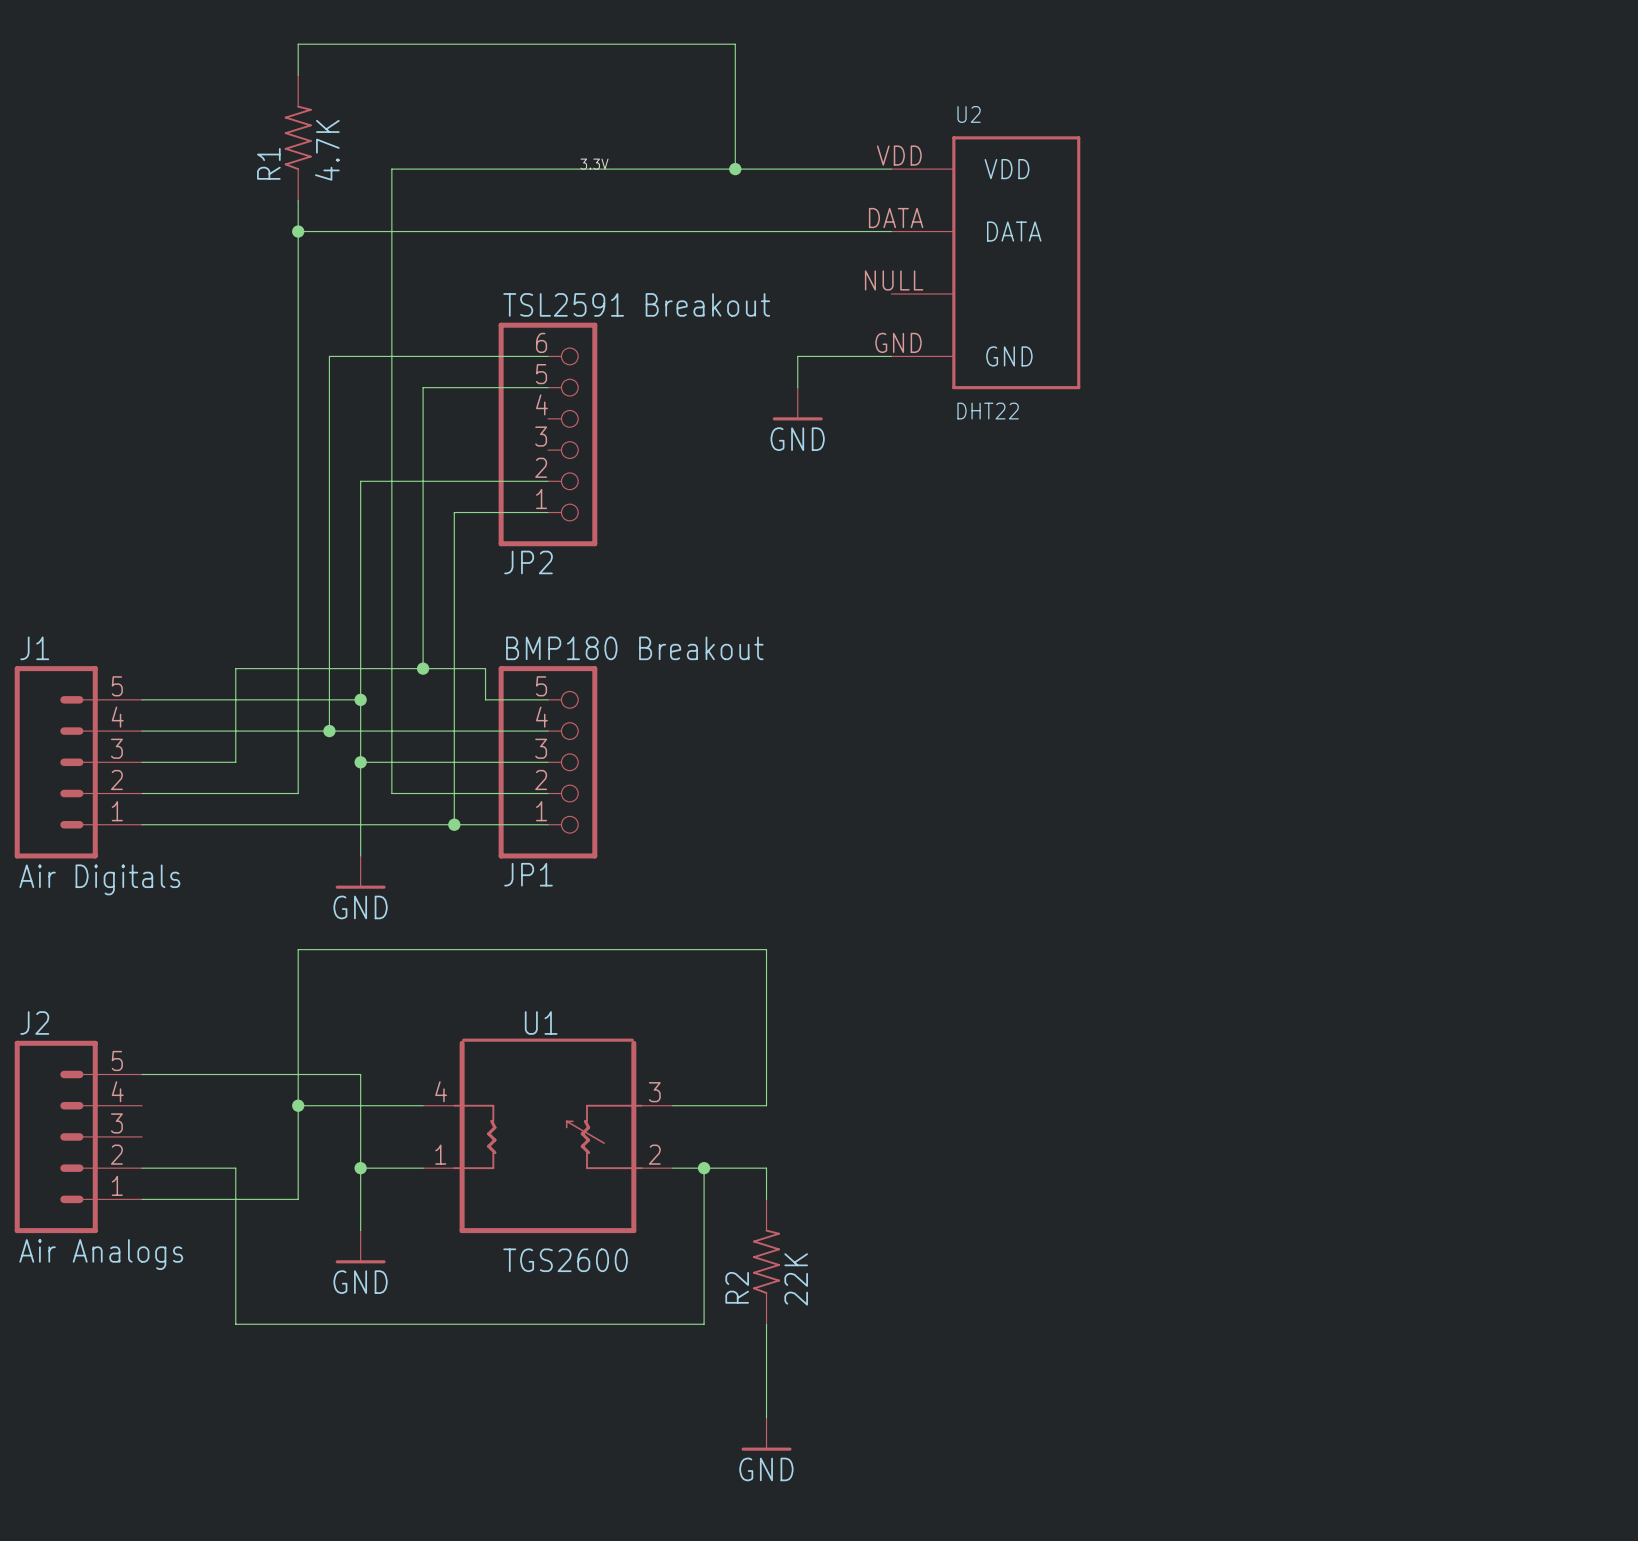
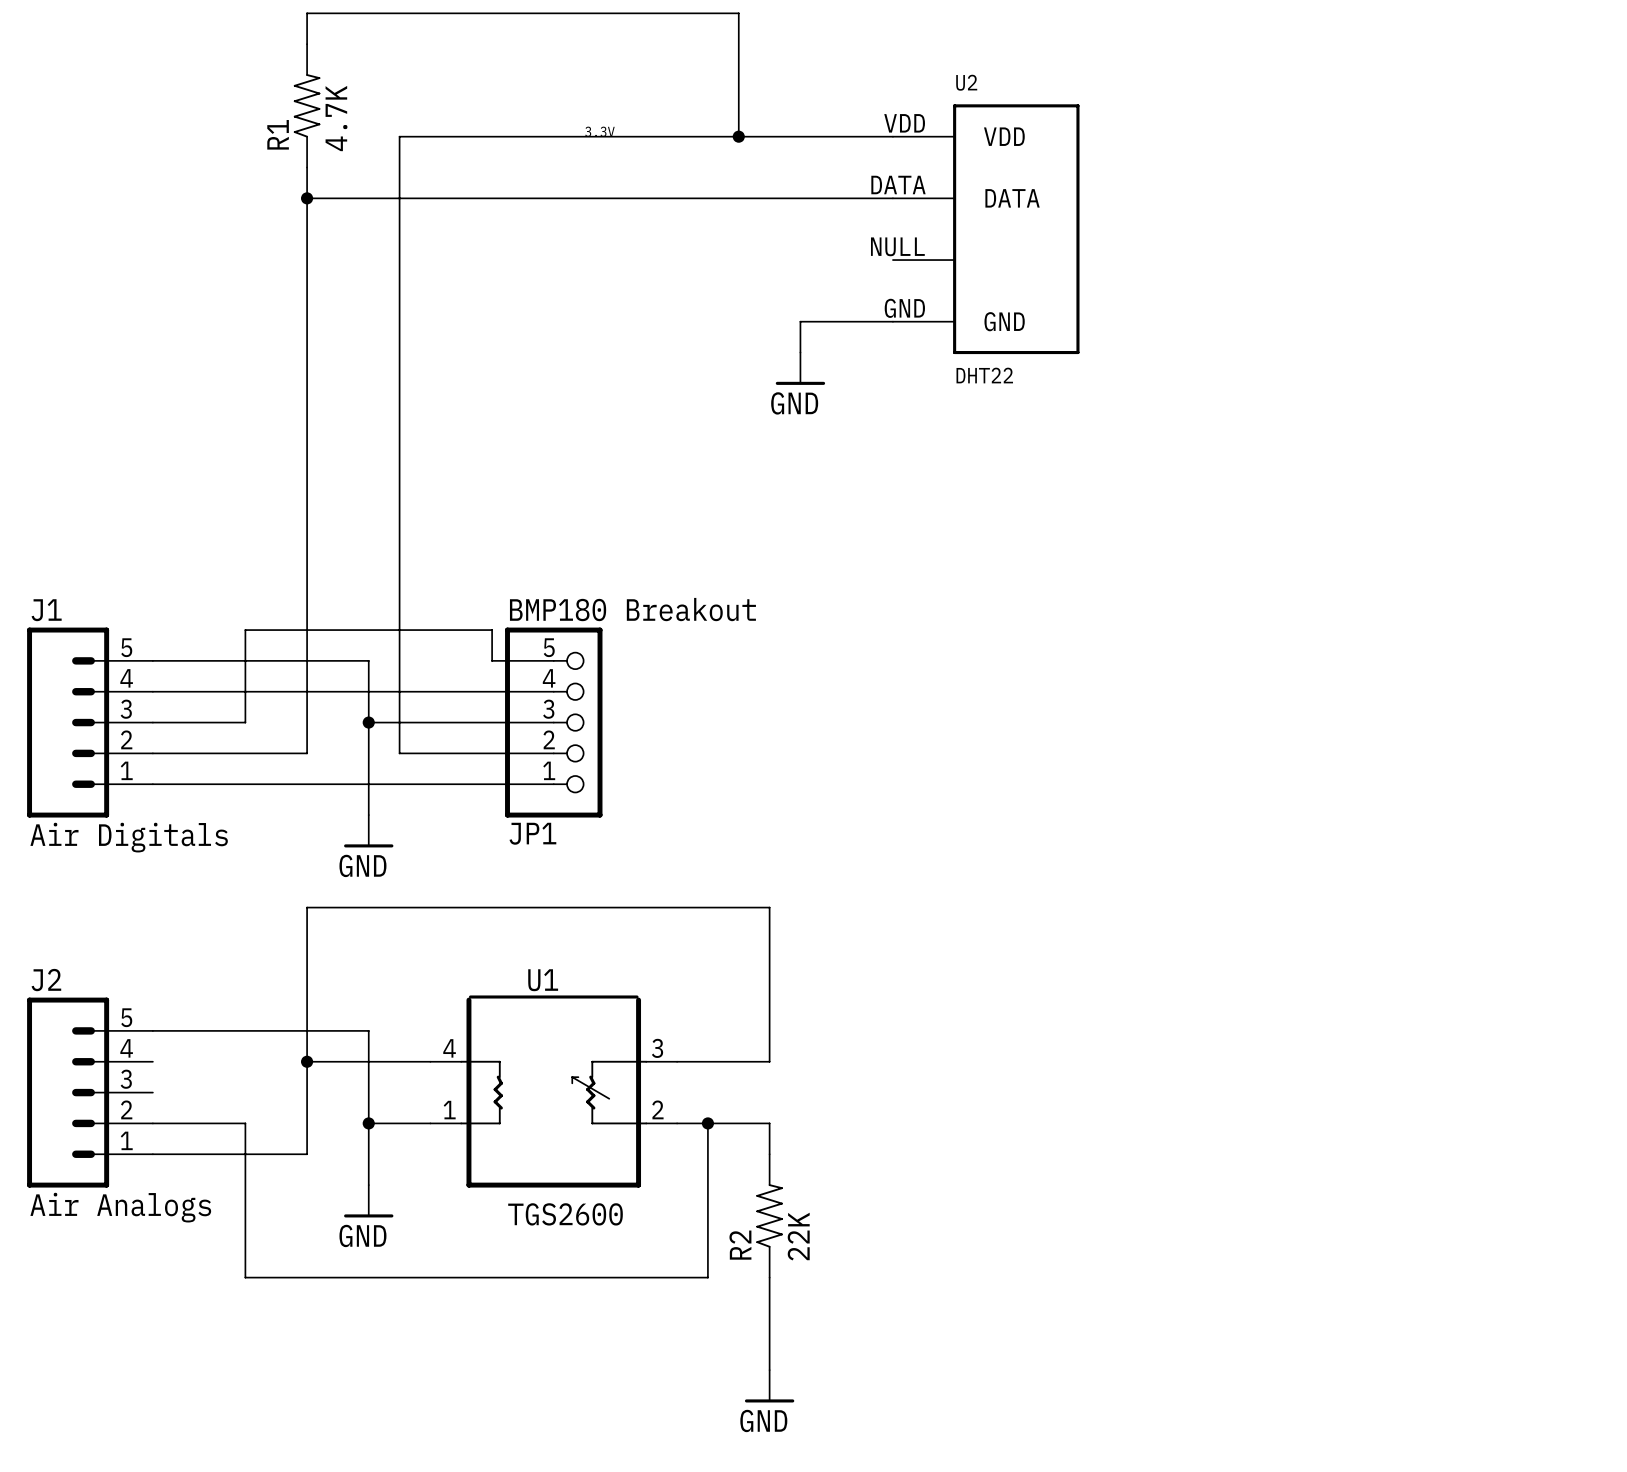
wire: (547, 356) (329, 356) (329, 731) -> none
wire: (547, 387) (423, 387) (423, 668) -> none
JP2: TSL2591 Breakout (547, 434) -> none
wire: (547, 481) (360, 481) (360, 699) -> none
wire: (547, 512) (454, 512) (454, 824) -> none
junction: (423, 668) -> none
junction: (360, 699) -> none
junction: (329, 731) -> none
junction: (454, 824) -> none

